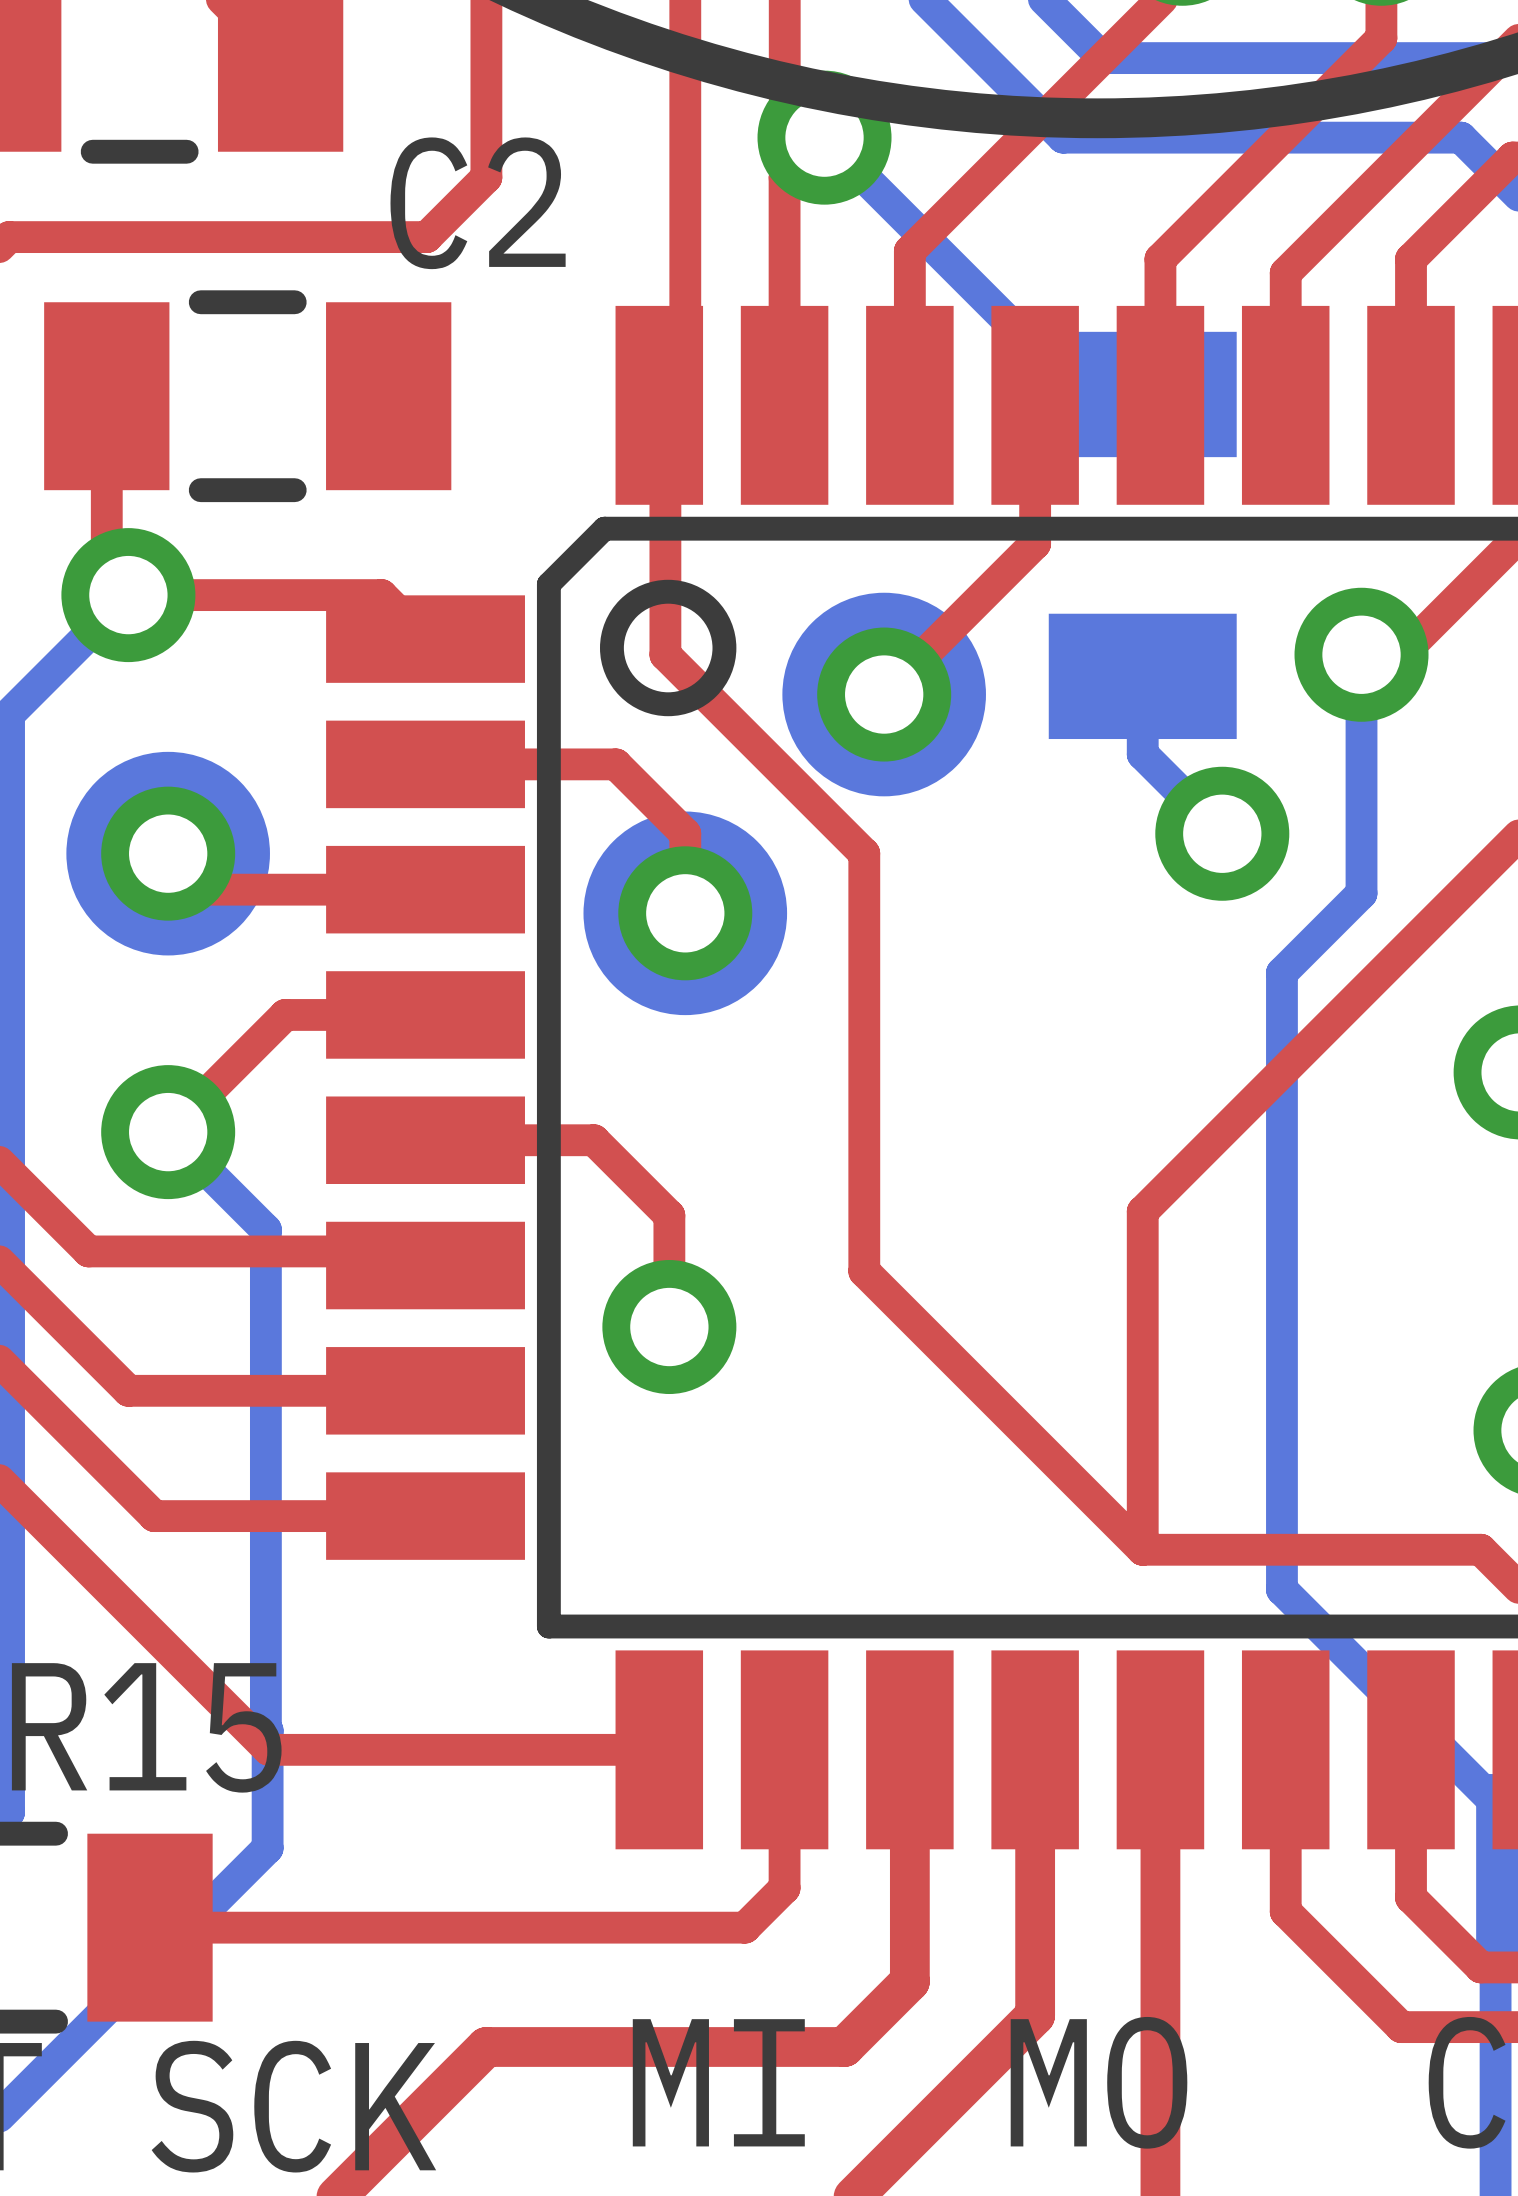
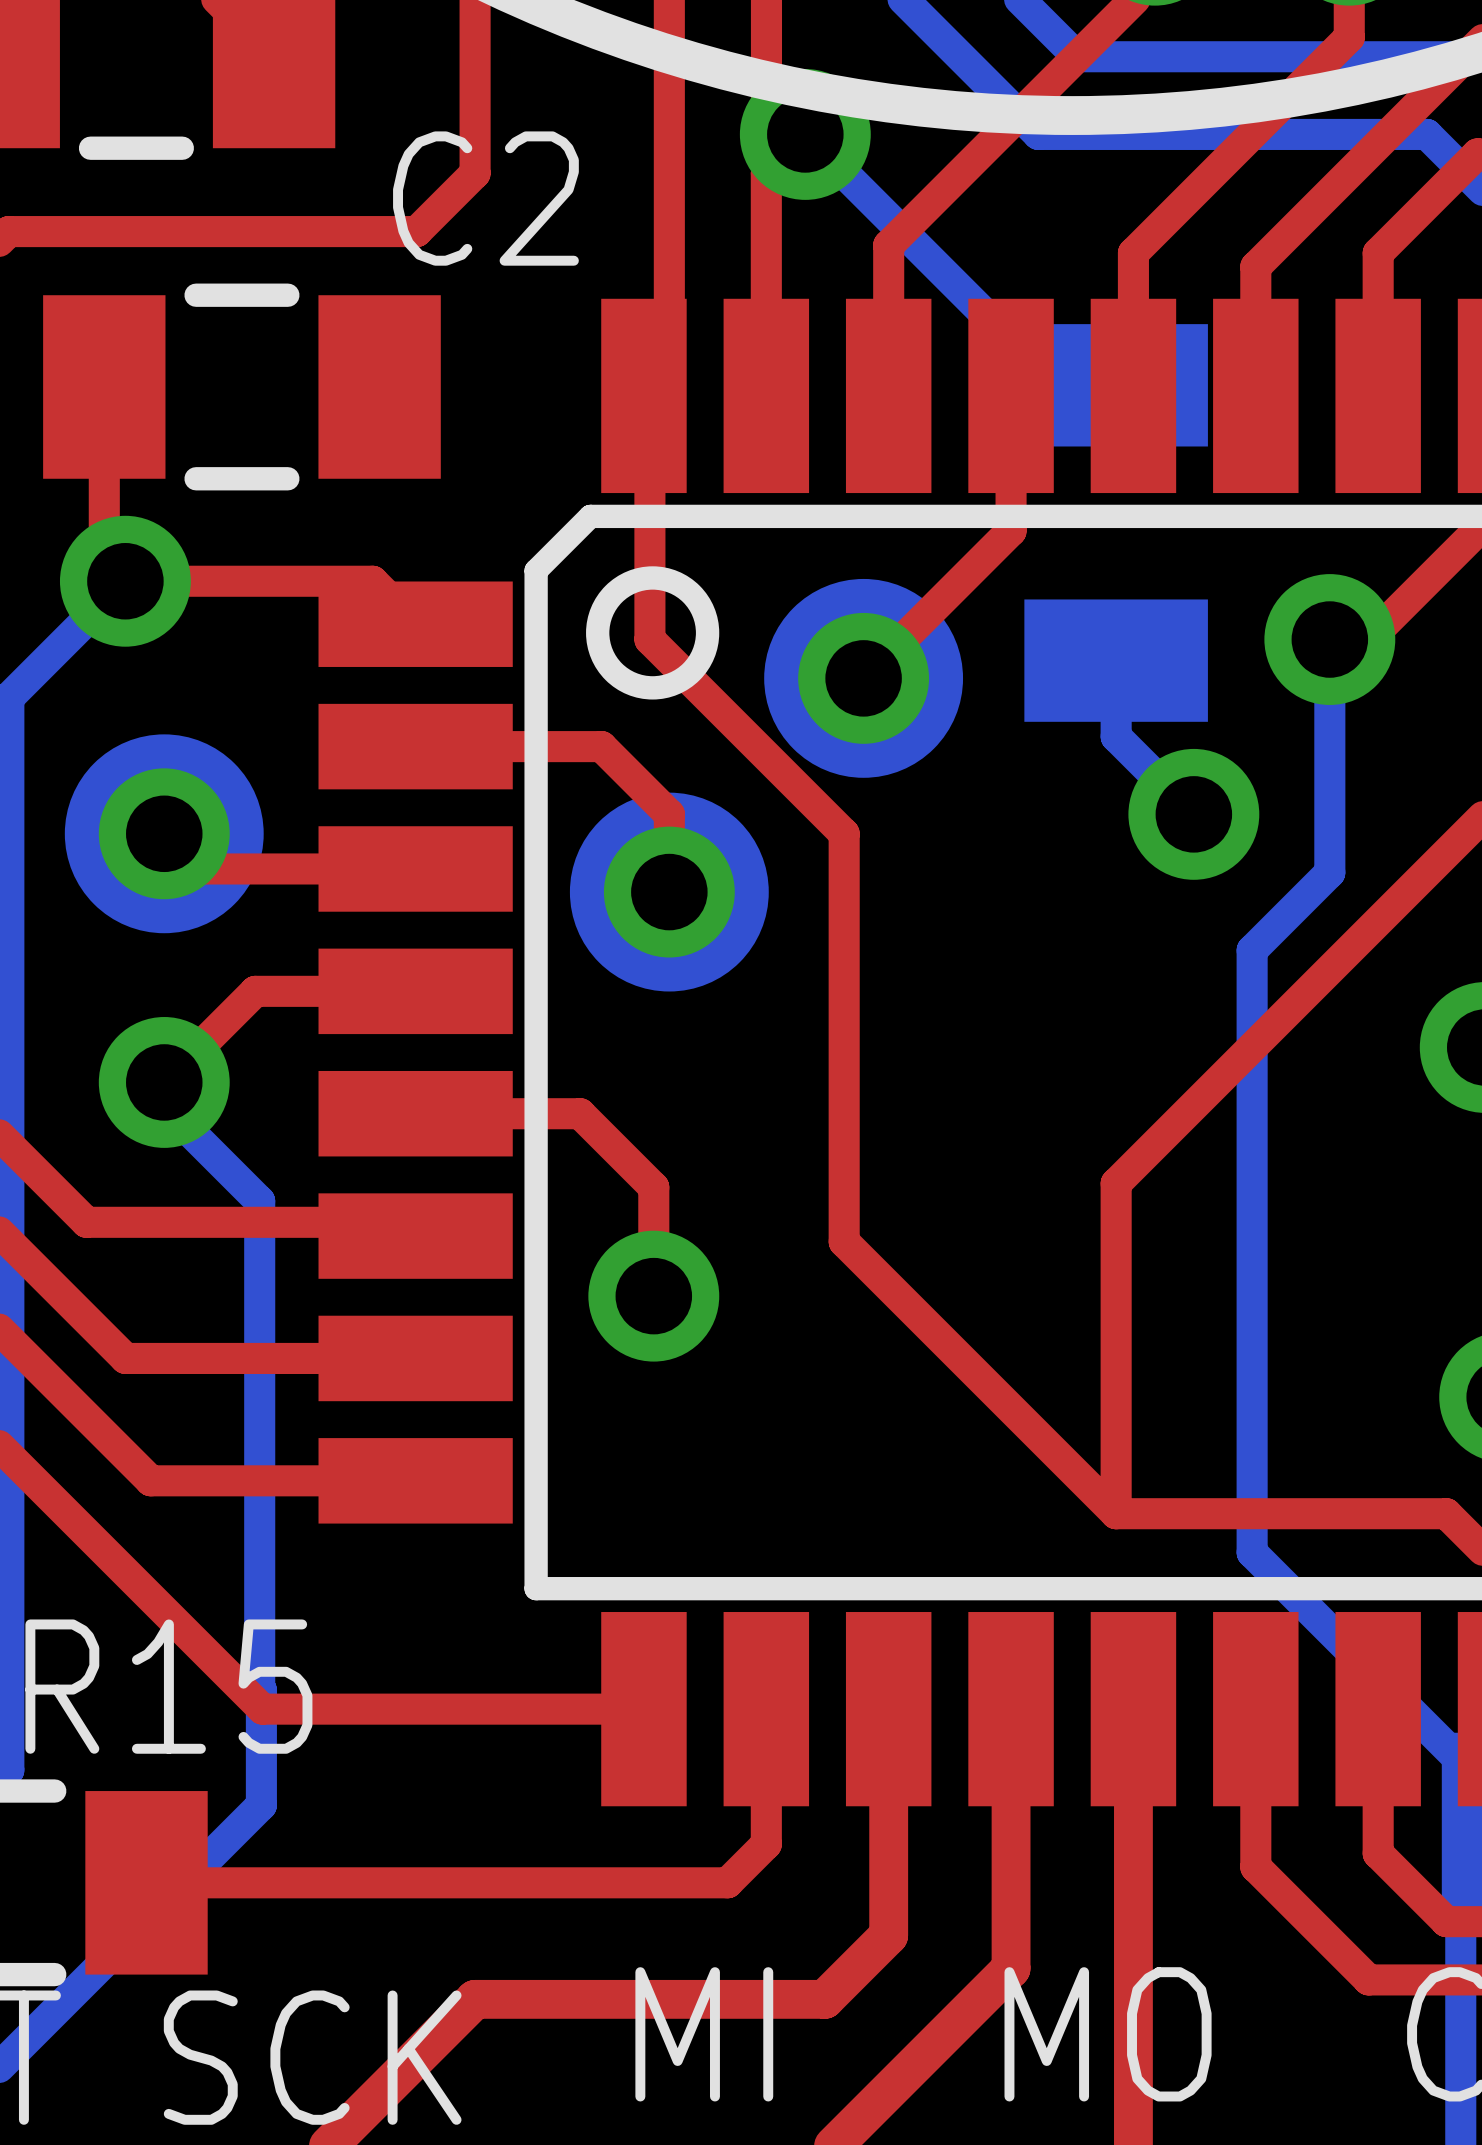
top track: (285, 1014) (168, 1132) -> (278, 991) (255, 991) (164, 1082)
via position: (168, 1132) -> (164, 1082)

